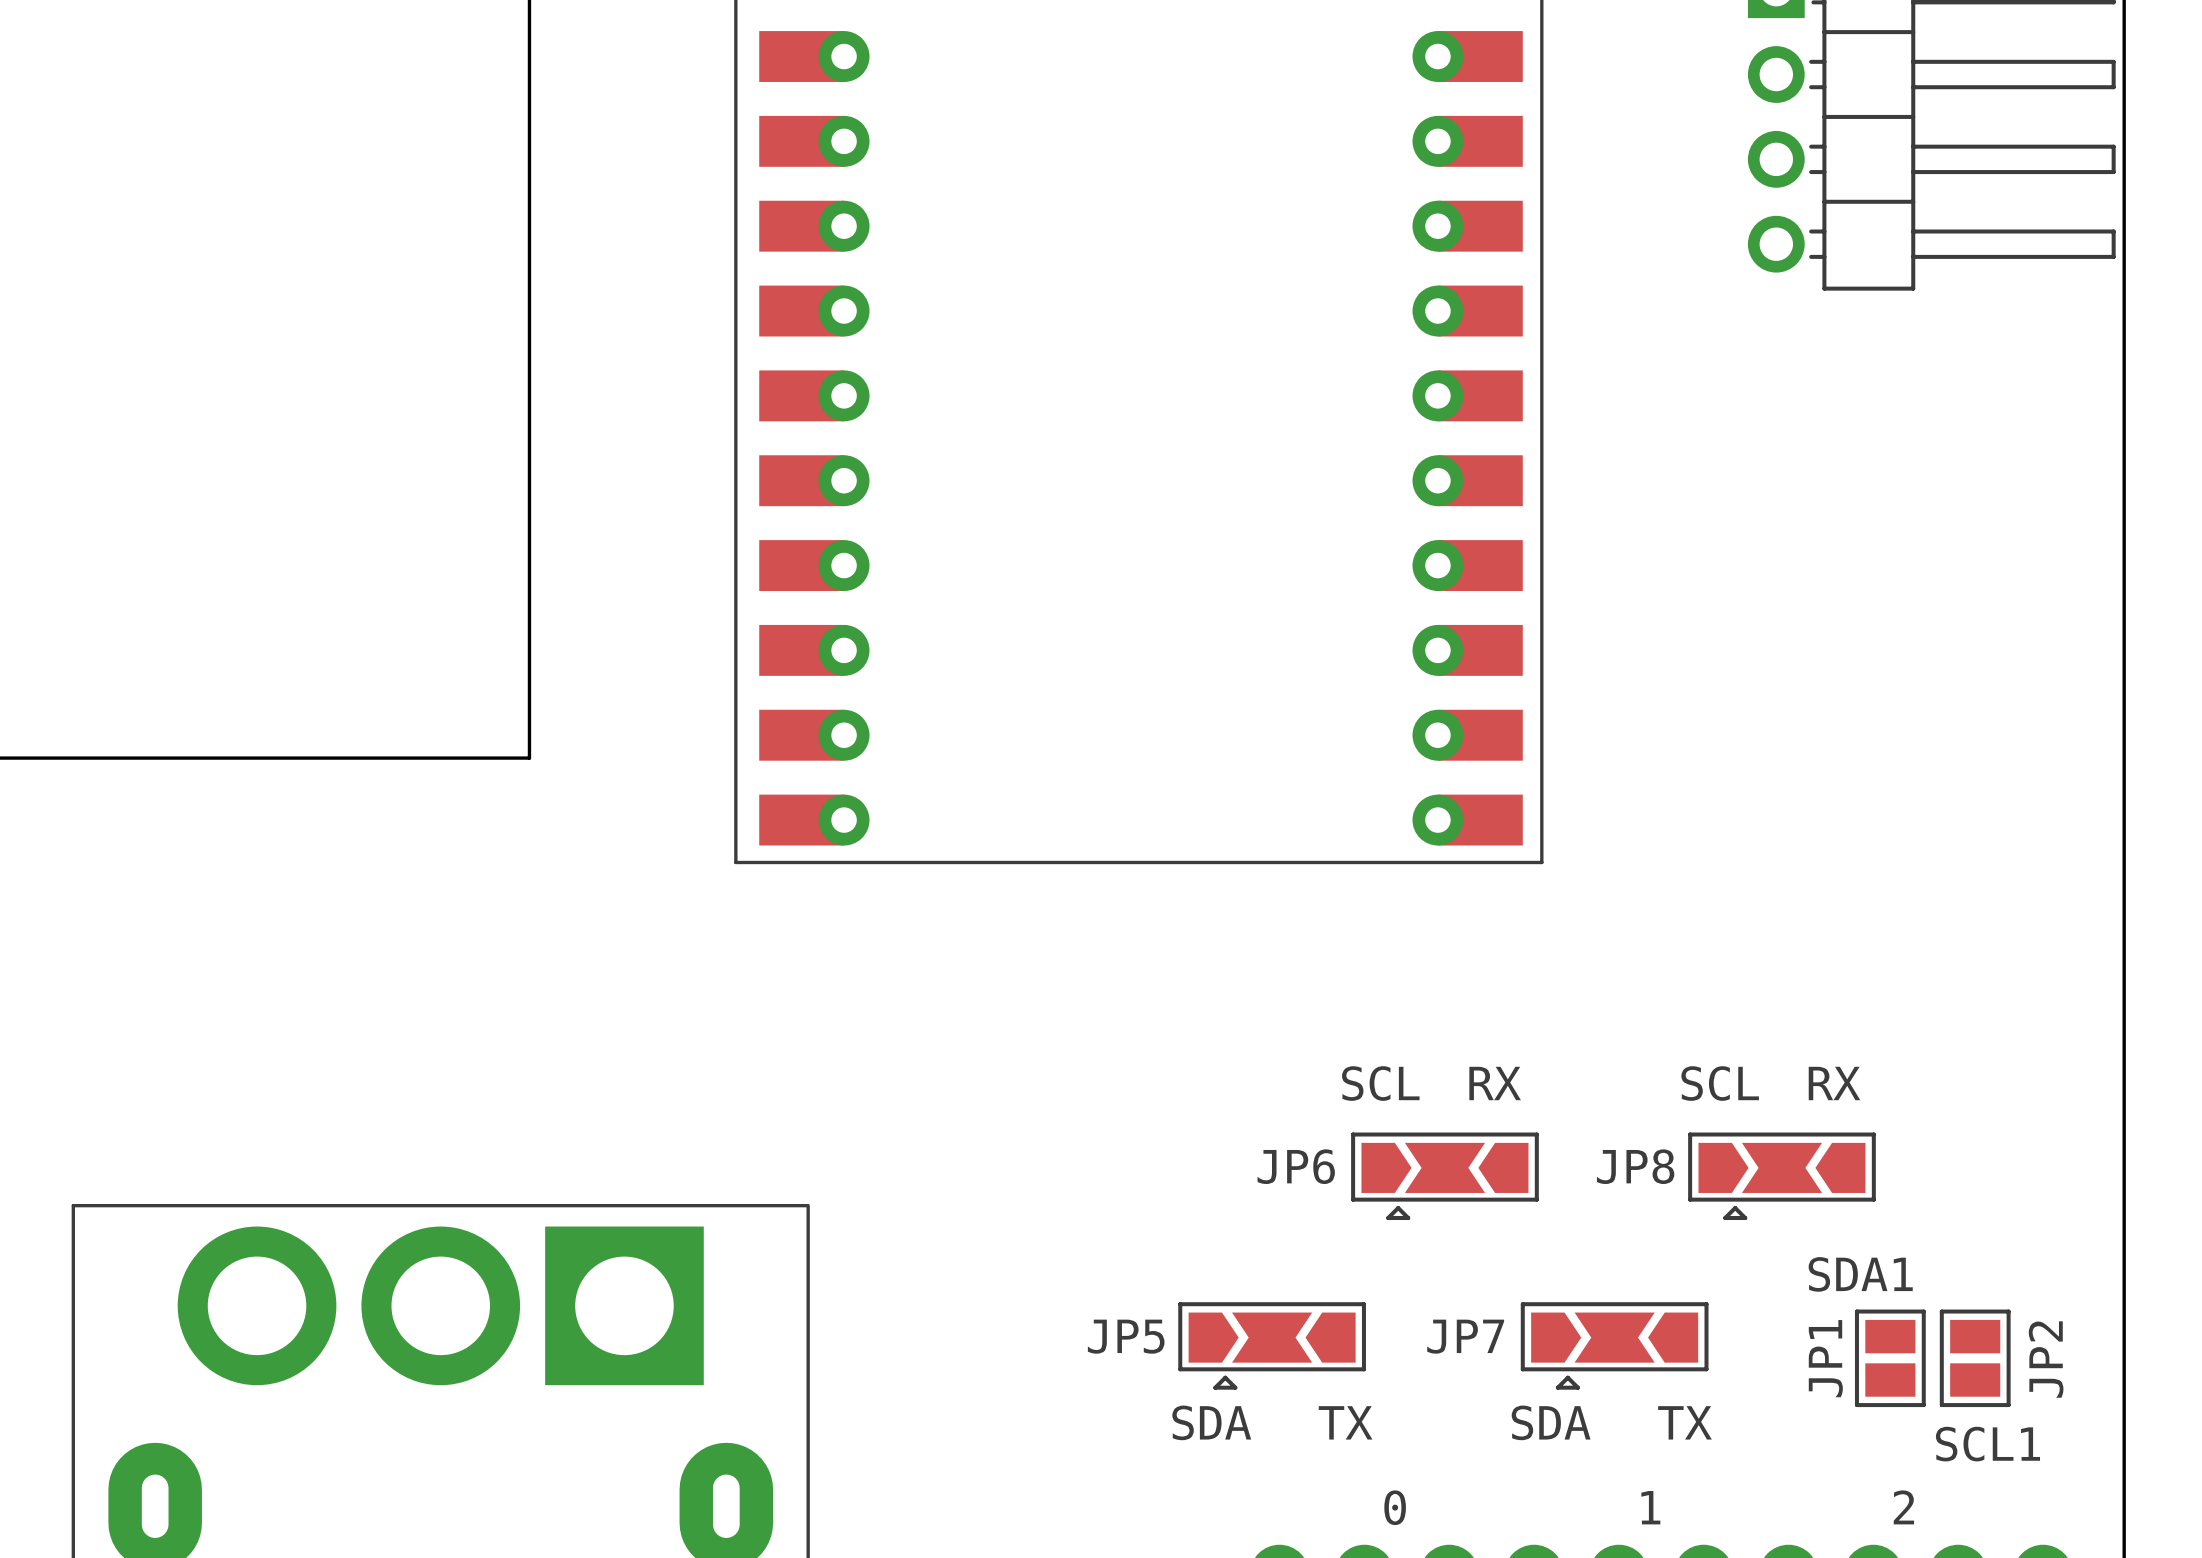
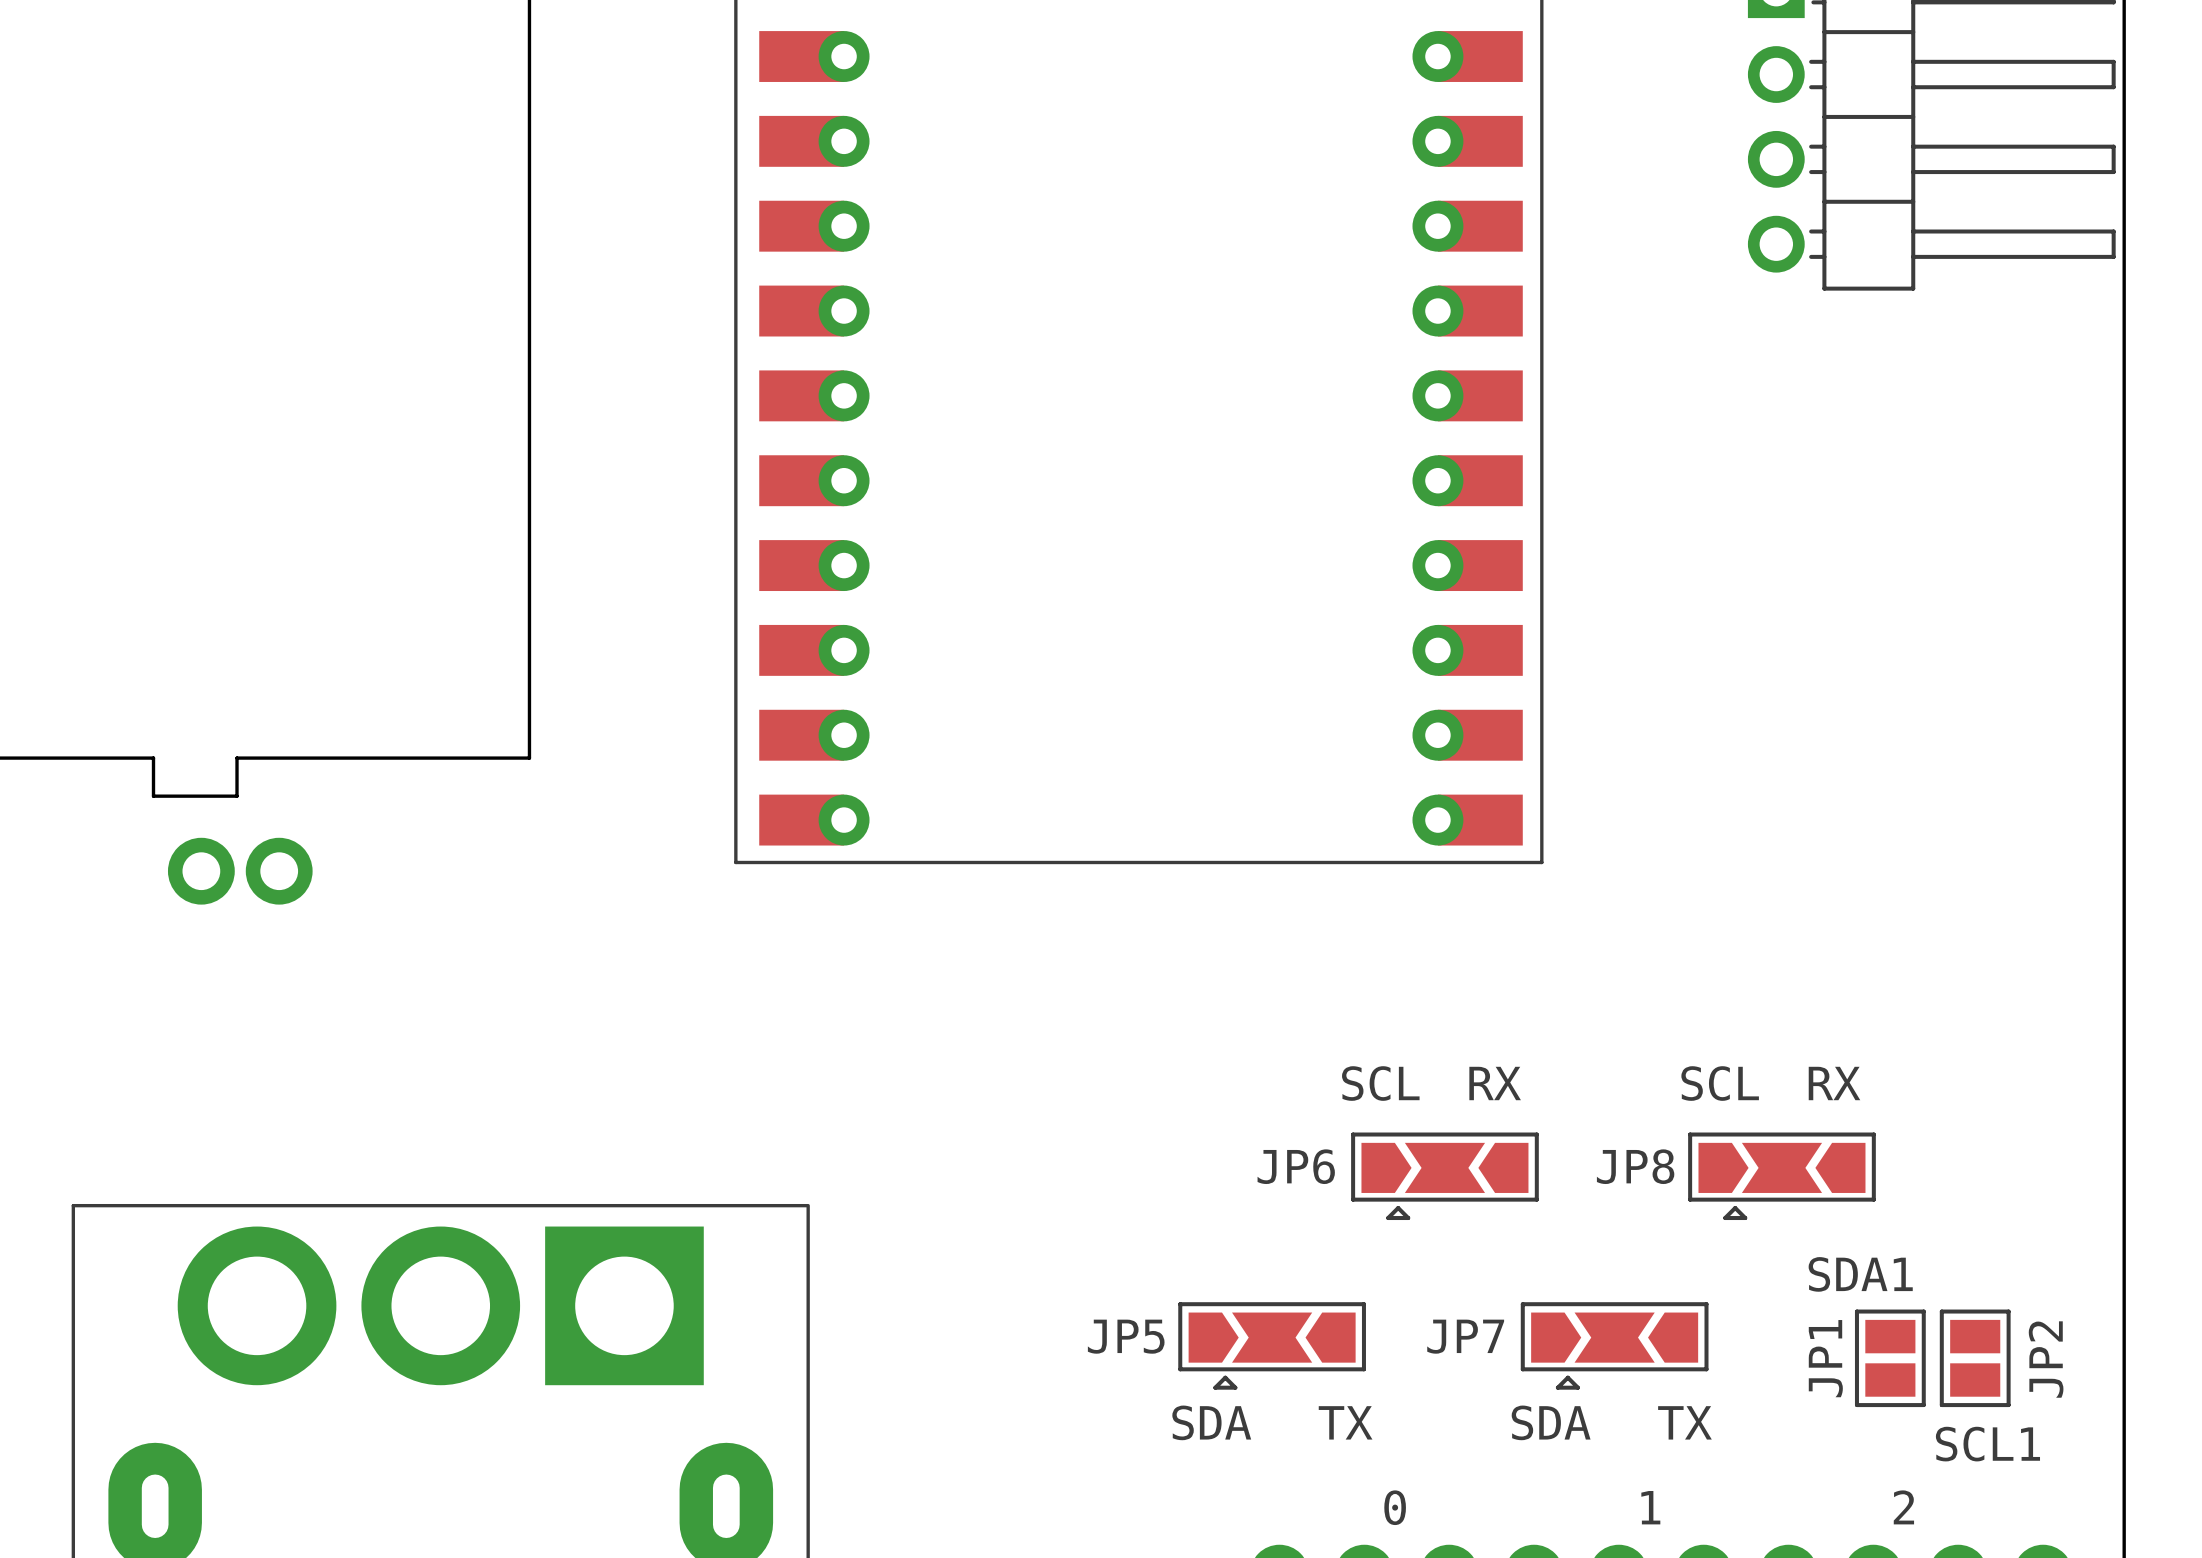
board edge: (153, 758) (237, 758) -> (153, 758) (153, 796) (237, 796) (237, 758)
part: none -> (240, 871)

